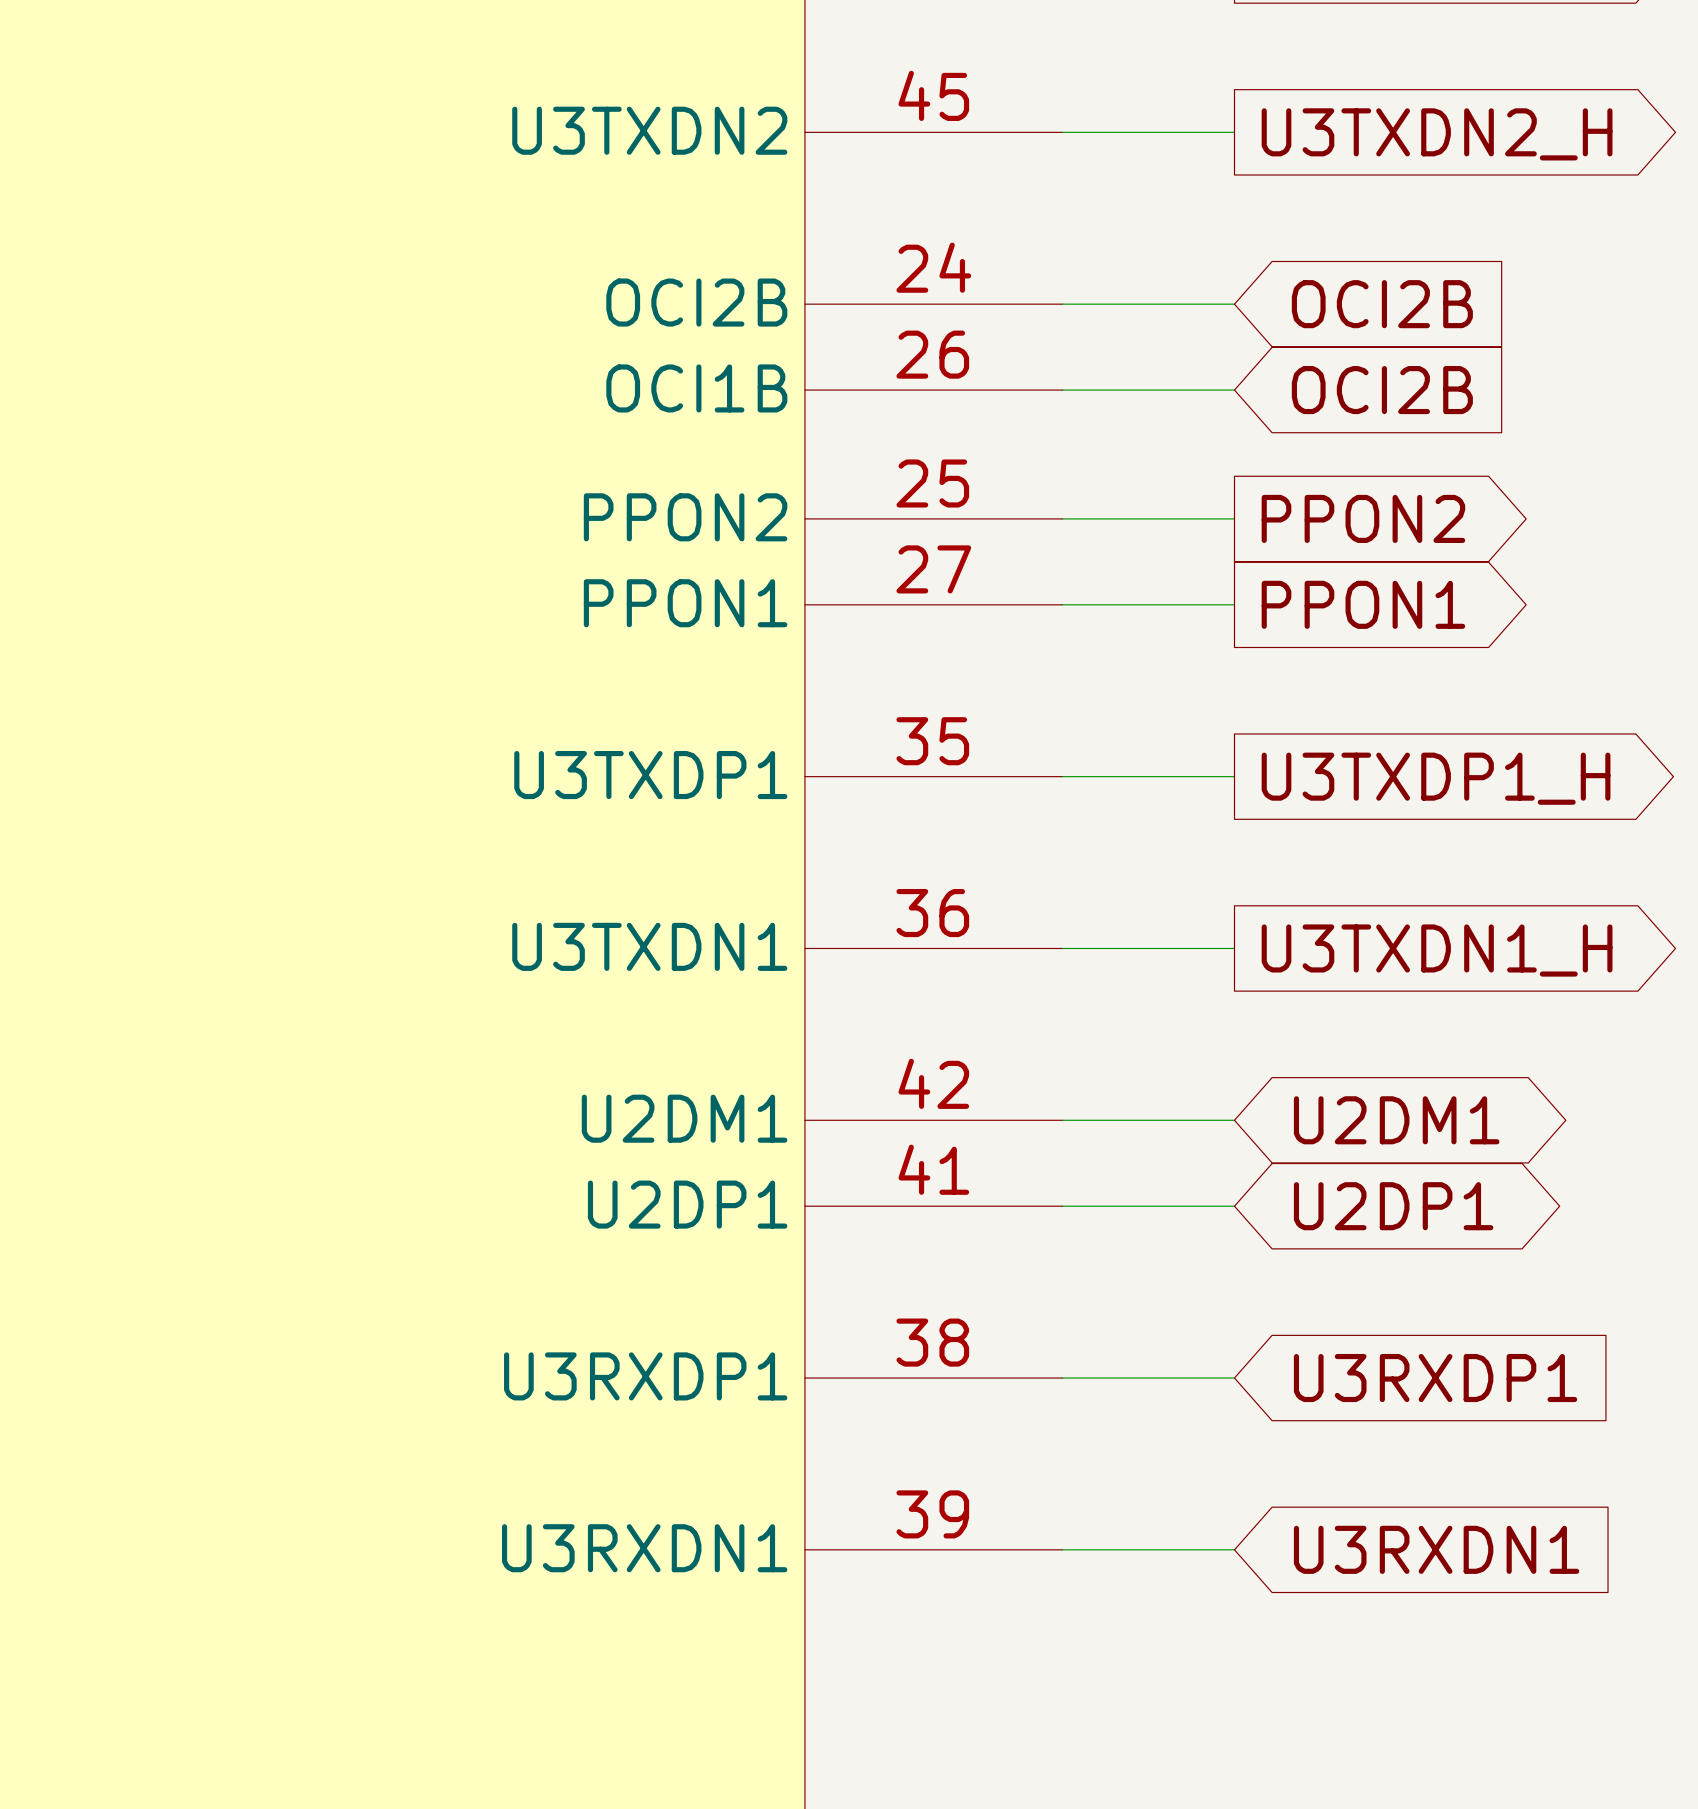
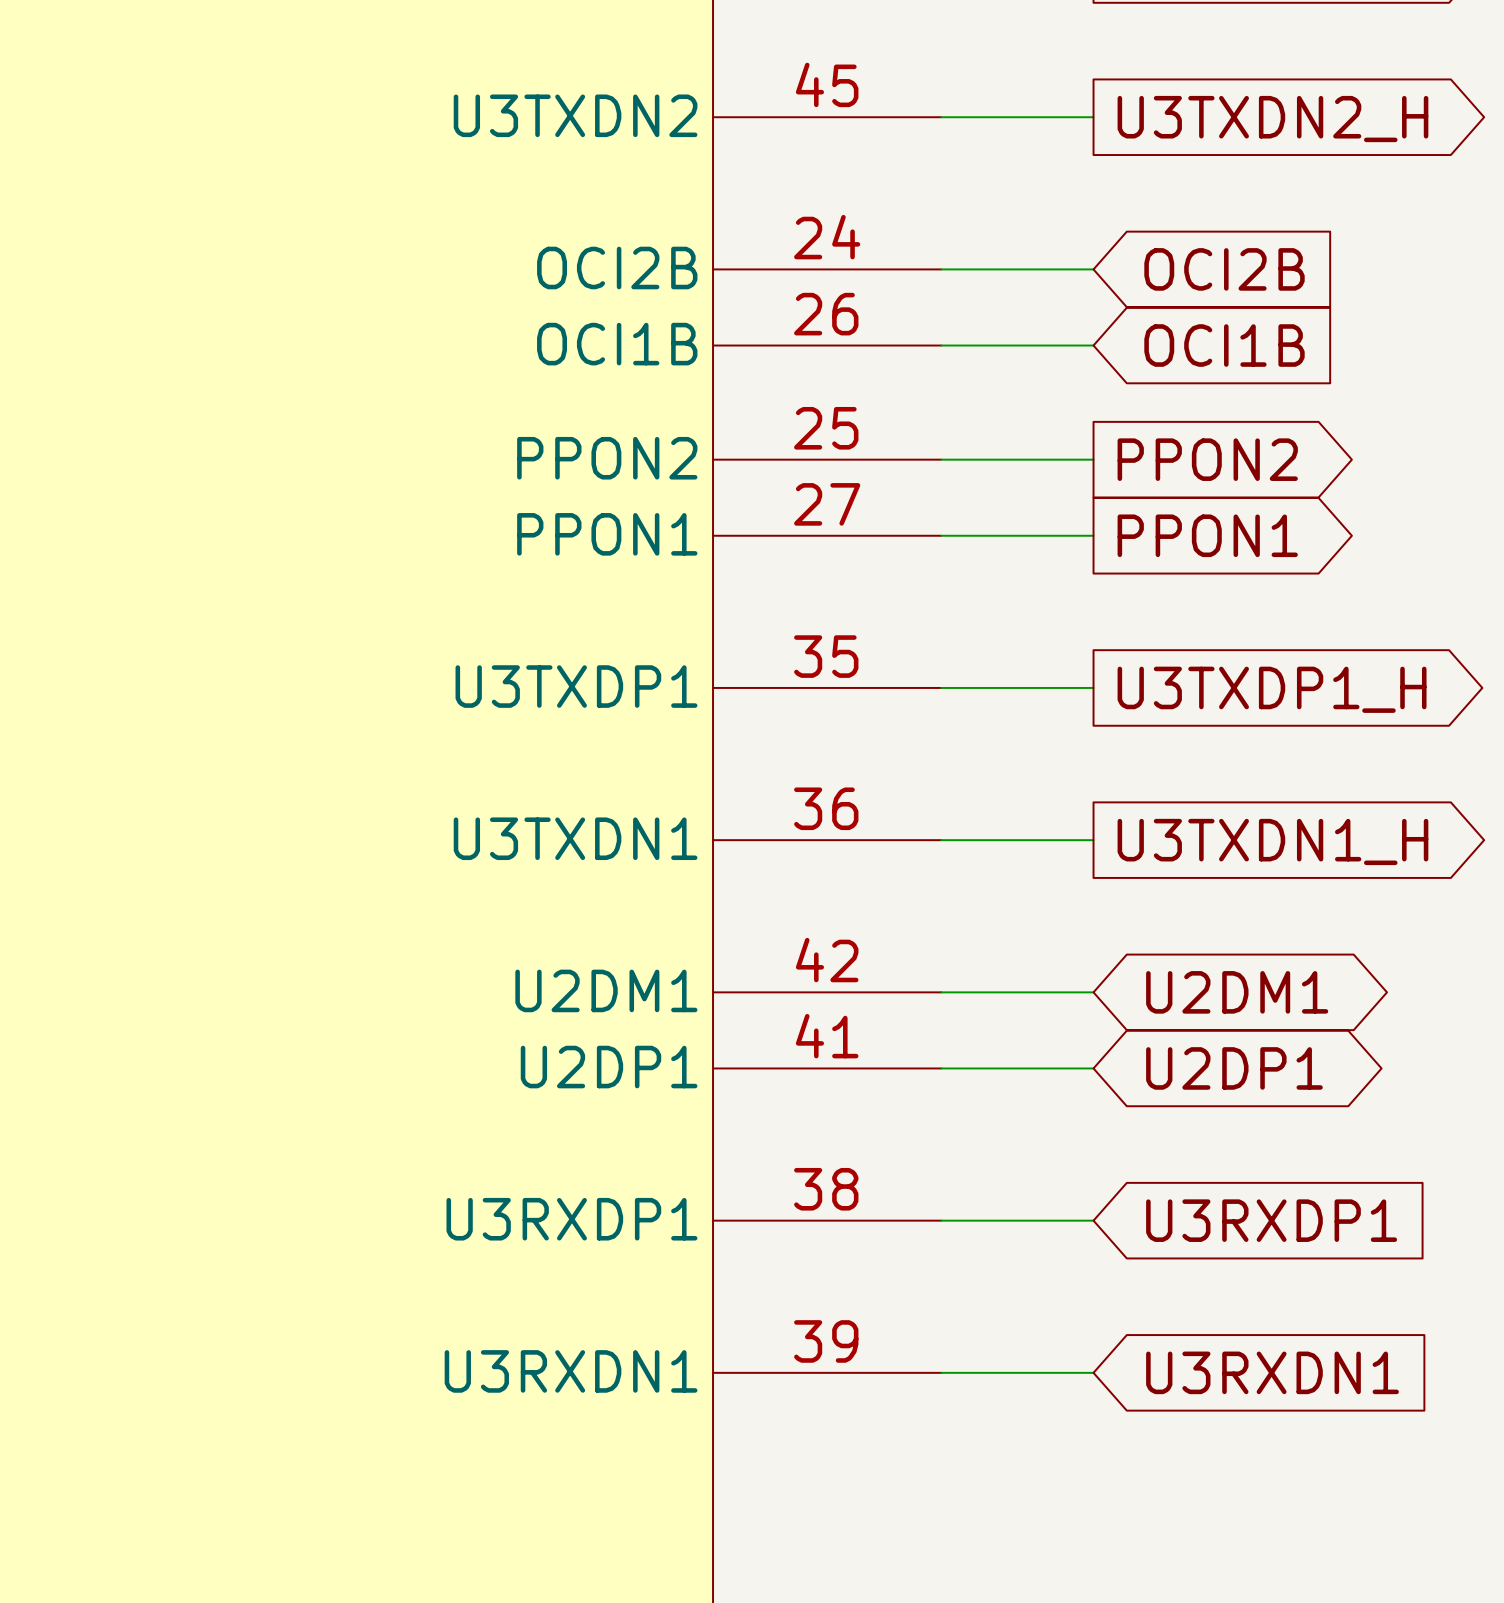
global label: OCI2B (1382, 390) -> OCI1B (1224, 345)

